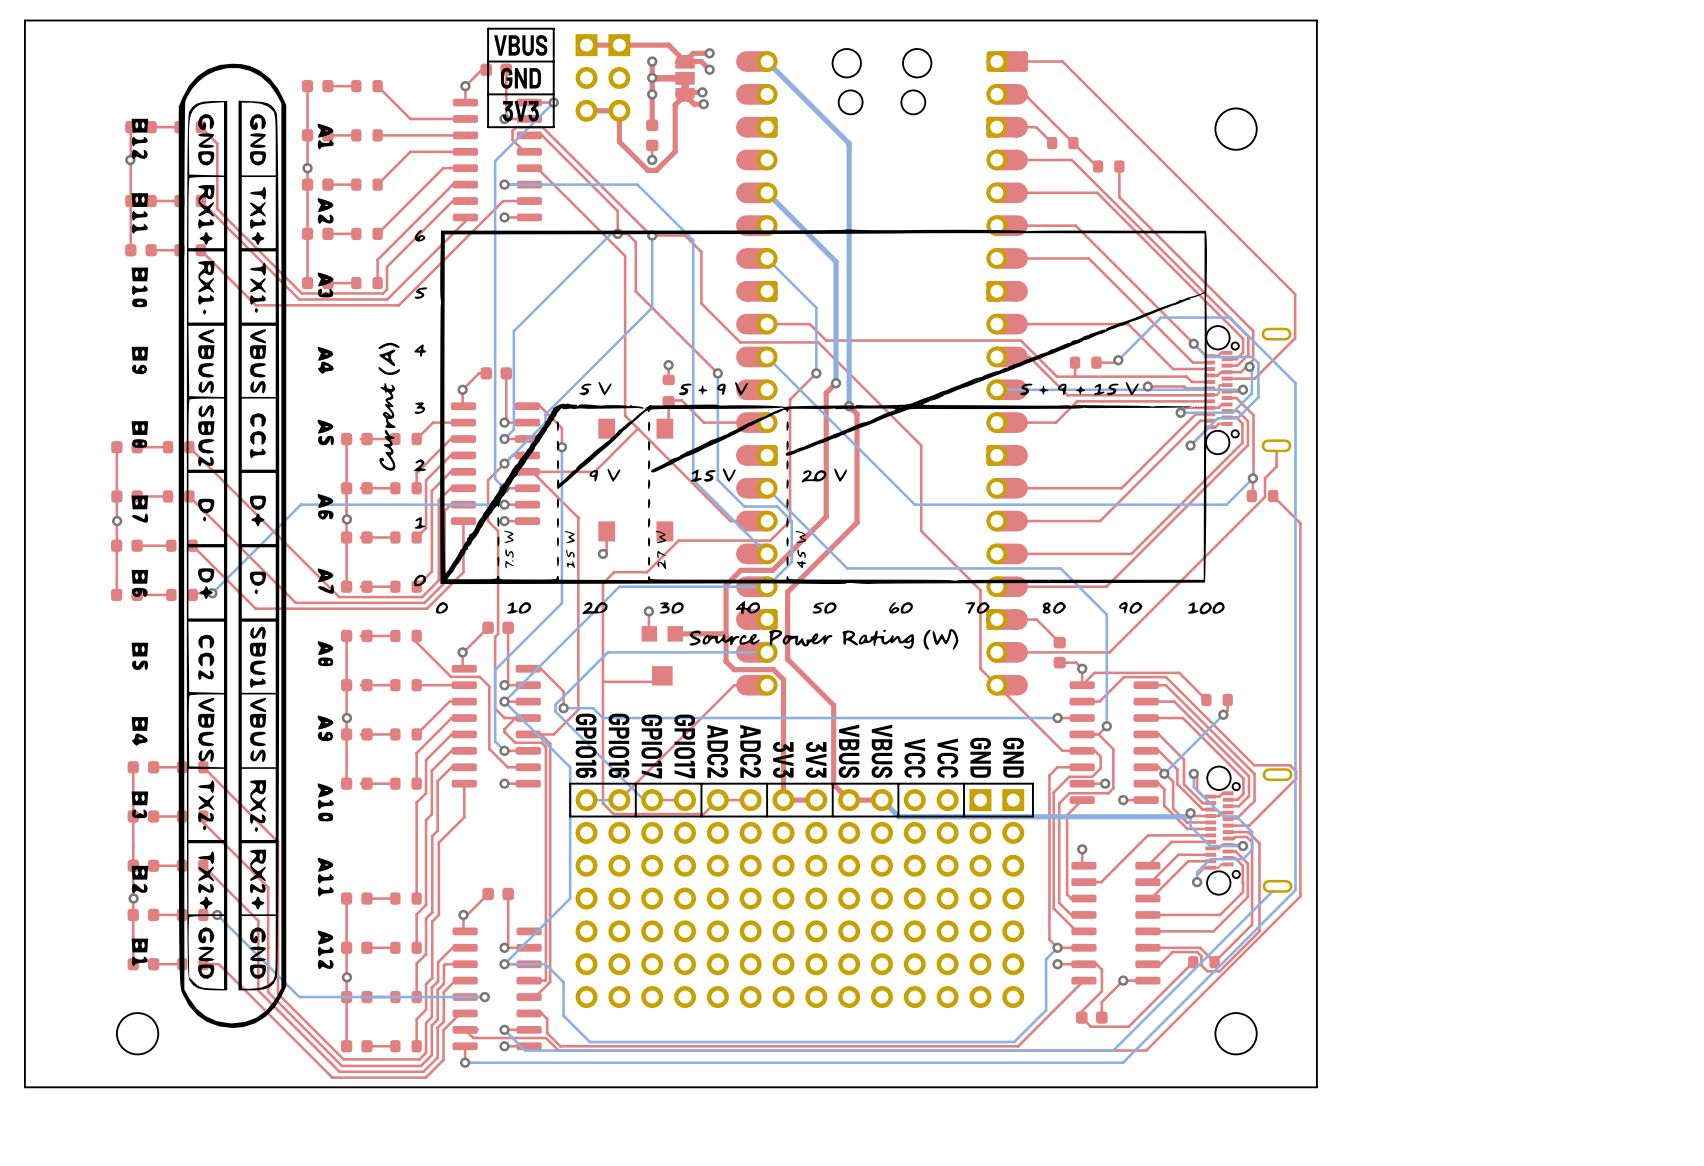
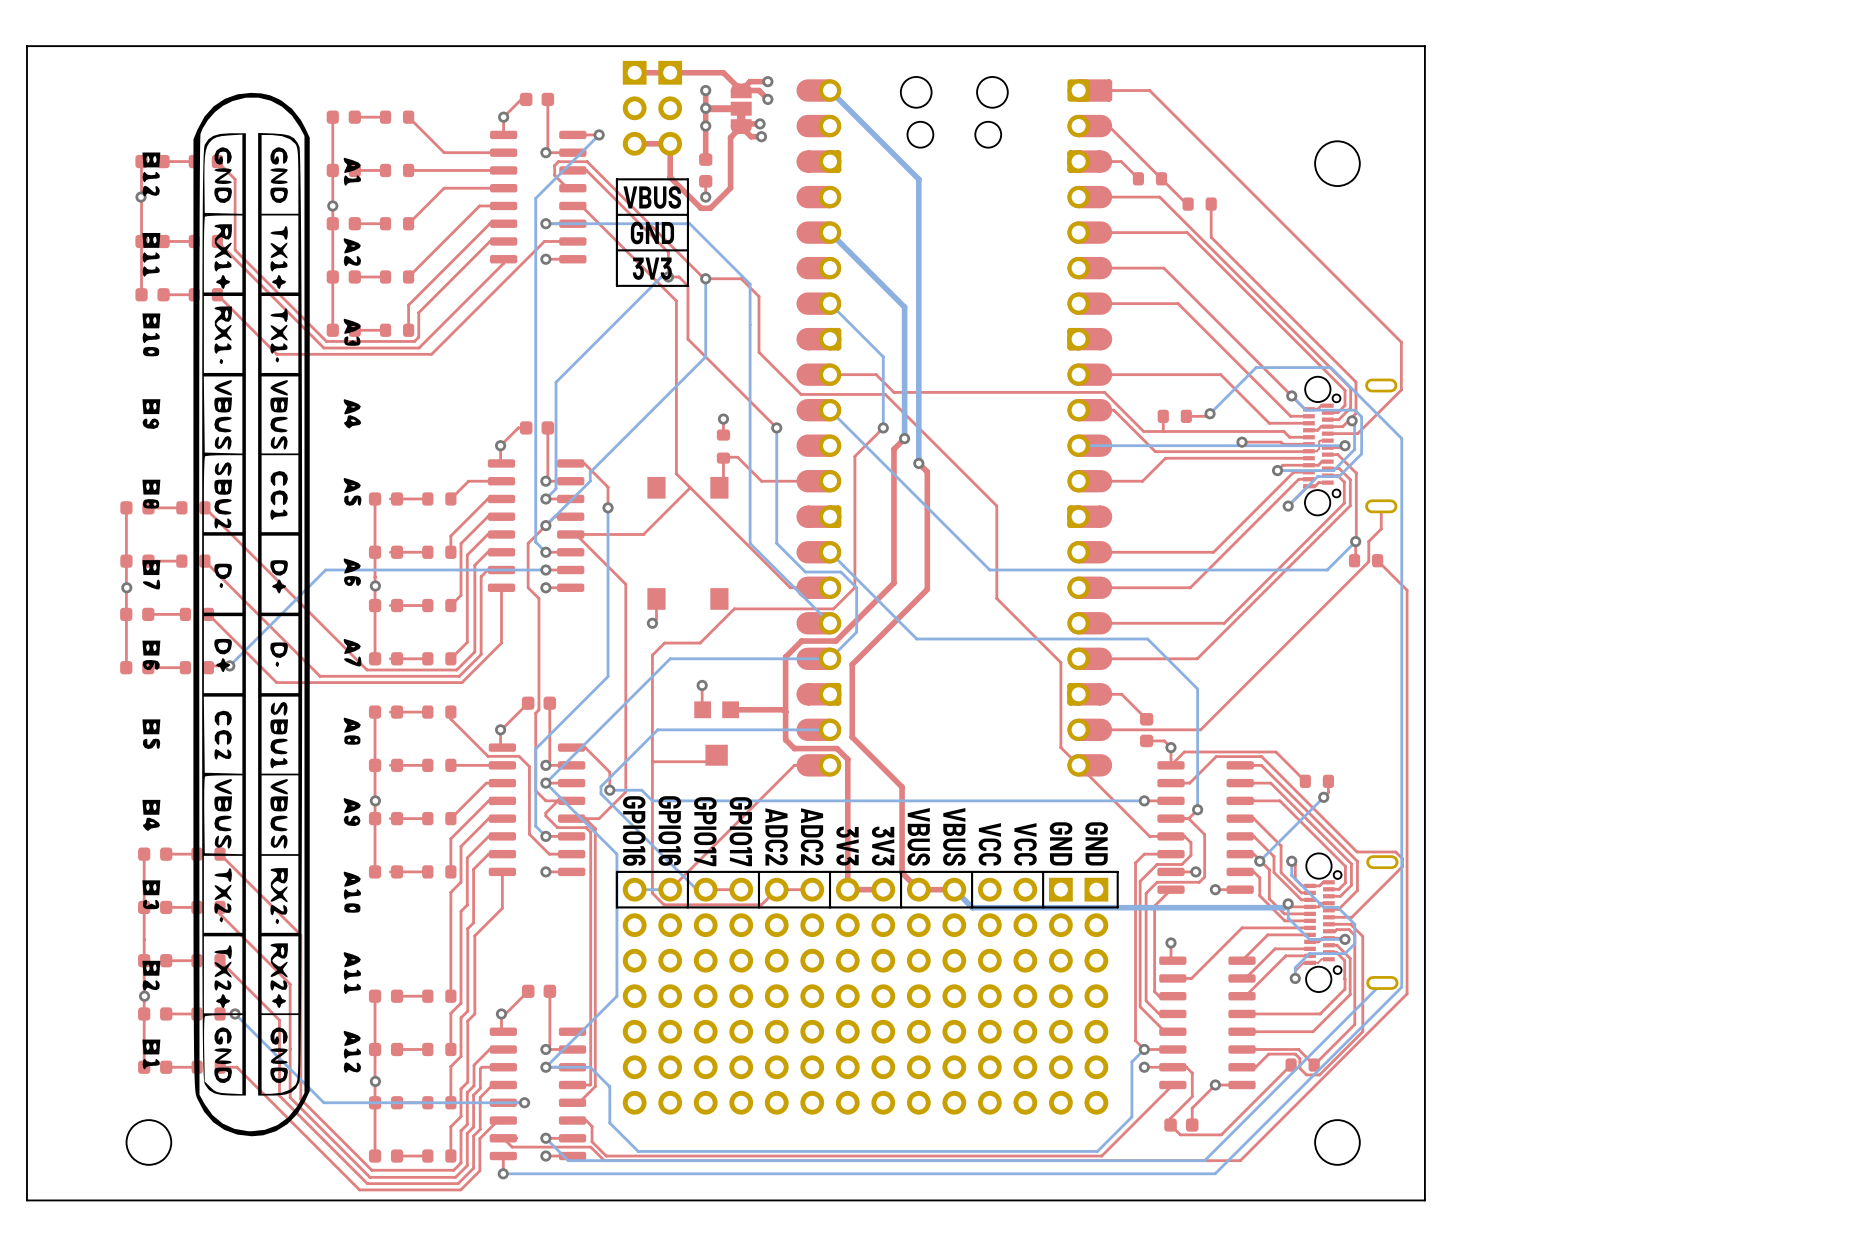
line: (553, 28) (553, 127) (488, 127) (488, 28) (553, 28) -> (687, 179) (687, 285) (616, 285) (616, 179) (687, 179)
text position: VBUS (520, 45) -> VBUS (652, 197)
line: (553, 61) (488, 61) -> (687, 250) (616, 250)
text position: GND (520, 78) -> GND (652, 233)
line: (553, 94) (488, 94) -> (687, 214) (616, 214)
text position: 3V3 (520, 111) -> 3V3 (652, 268)
drawing: [378, 229, 1225, 650] -> none

